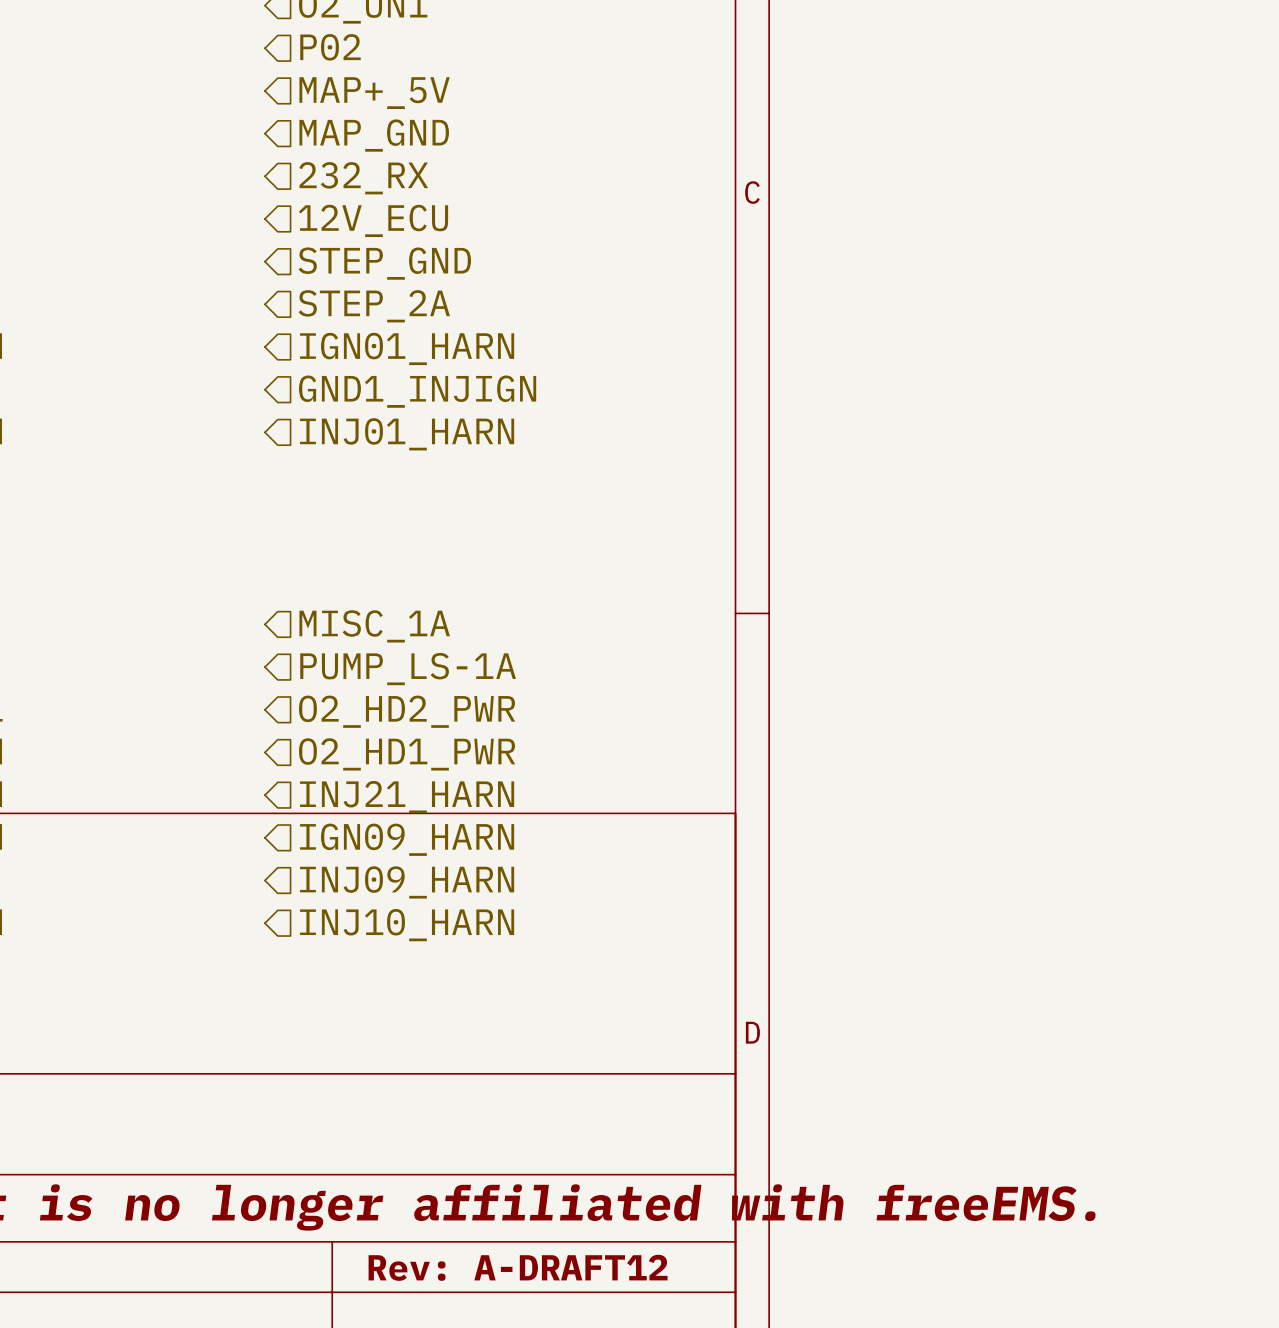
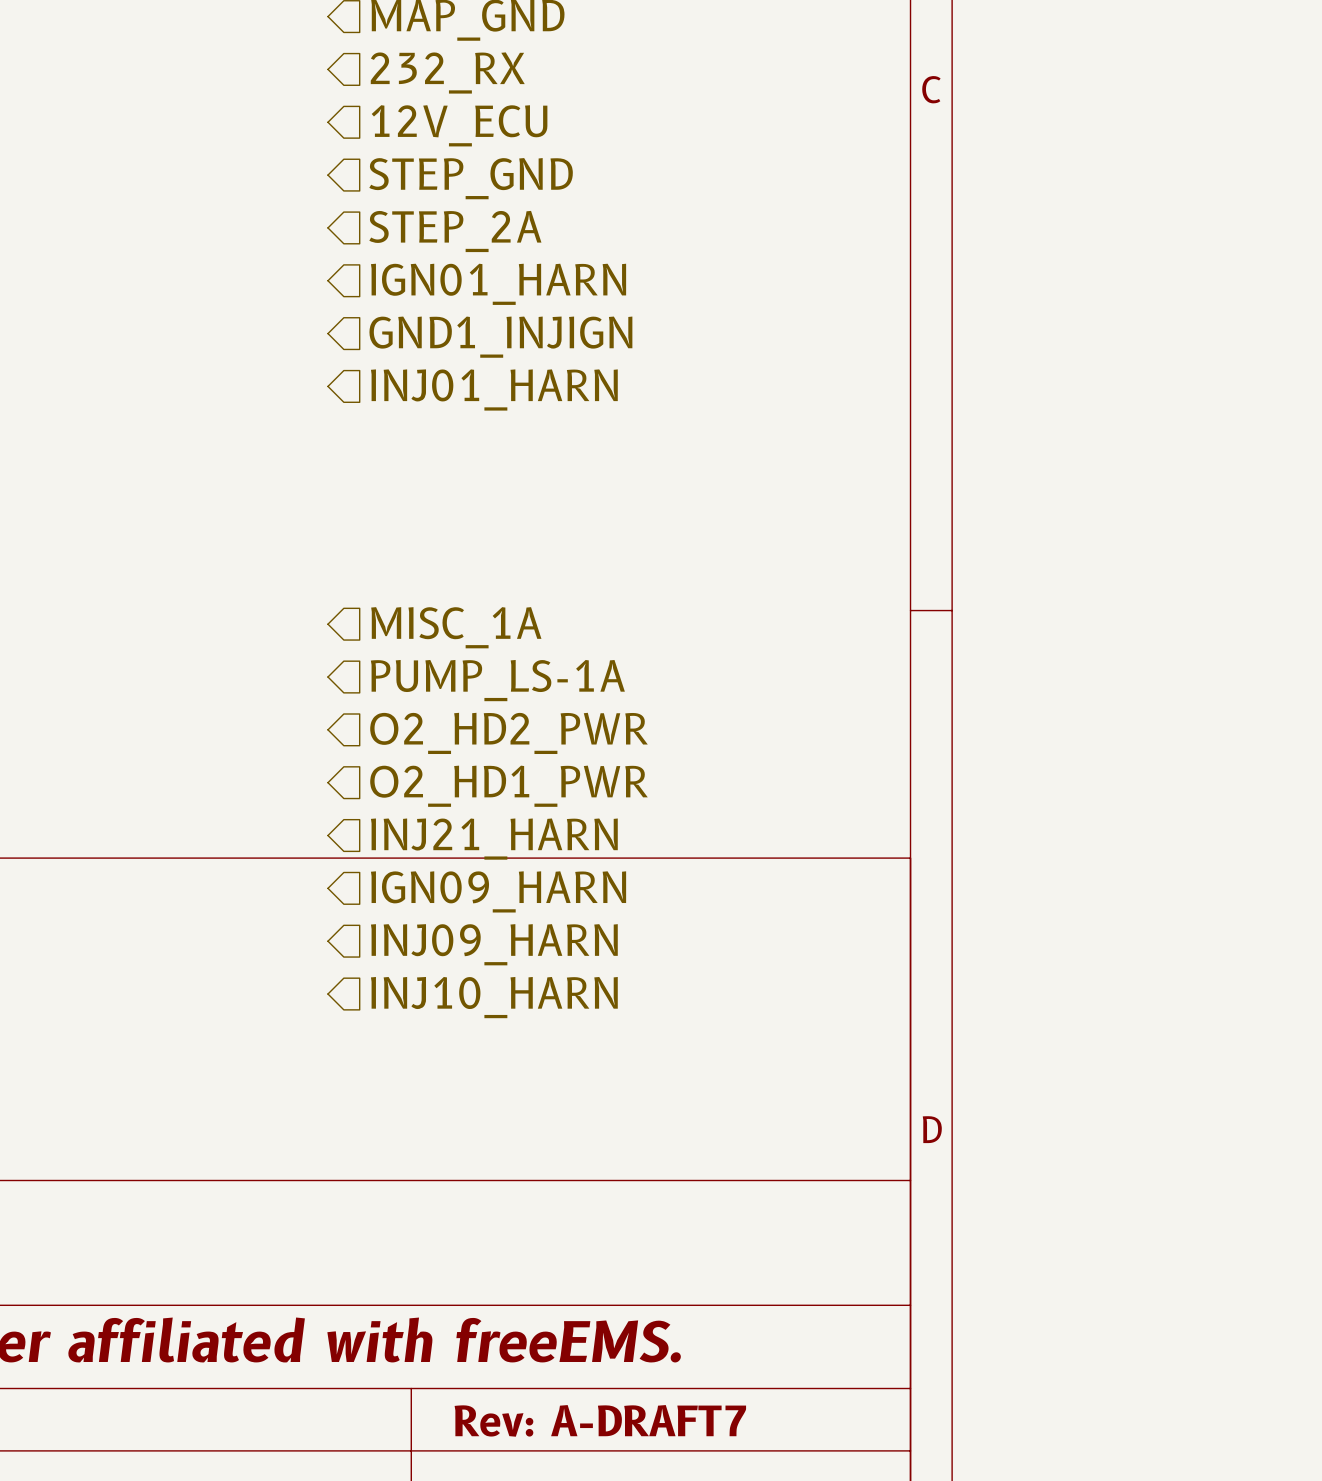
title block: Rev: A-DRAFT12 (518, 1267) -> Rev: A-DRAFT7 (600, 1420)

